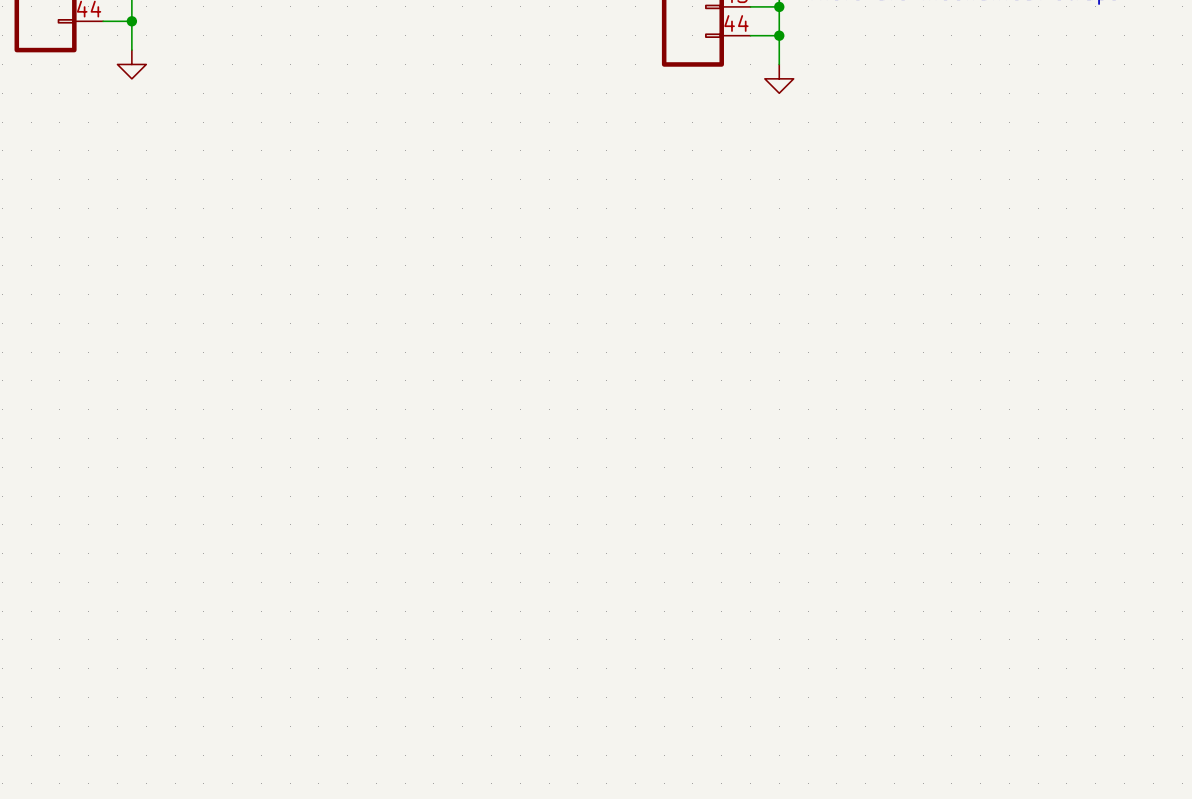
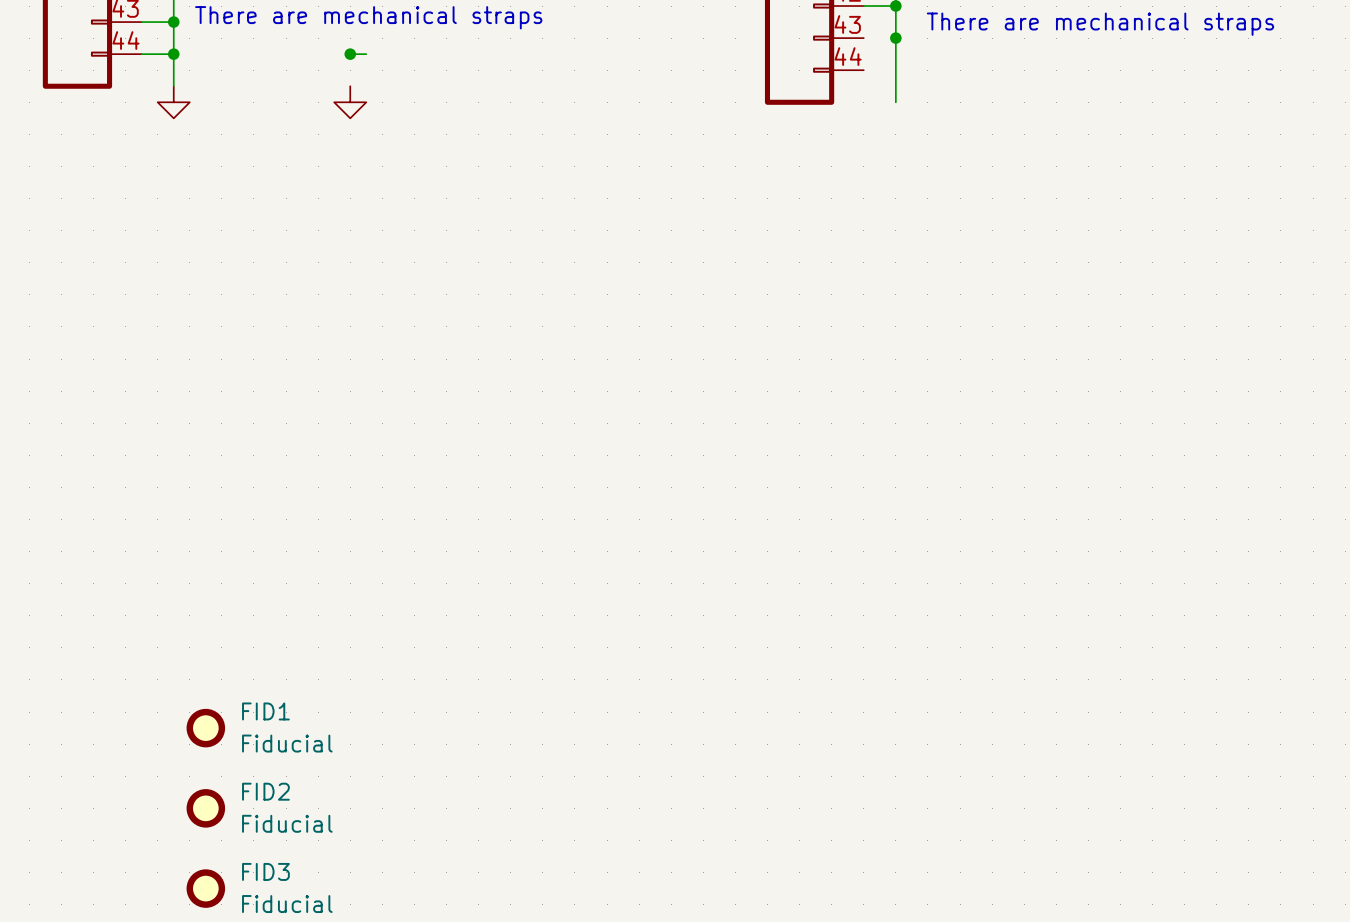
wire: (750, 6) (779, 6) -> none
wire: none -> (350, 54) (366, 54)
junction: none -> (350, 54)
wire: (750, 35) (779, 35) -> none
junction: (779, 35) -> none
power symbol: none -> (350, 102)
power symbol: (779, 78) -> none
FID1: none -> Fiducial (205, 728)
FID2: none -> Fiducial (205, 808)
FID3: none -> Fiducial (205, 888)

